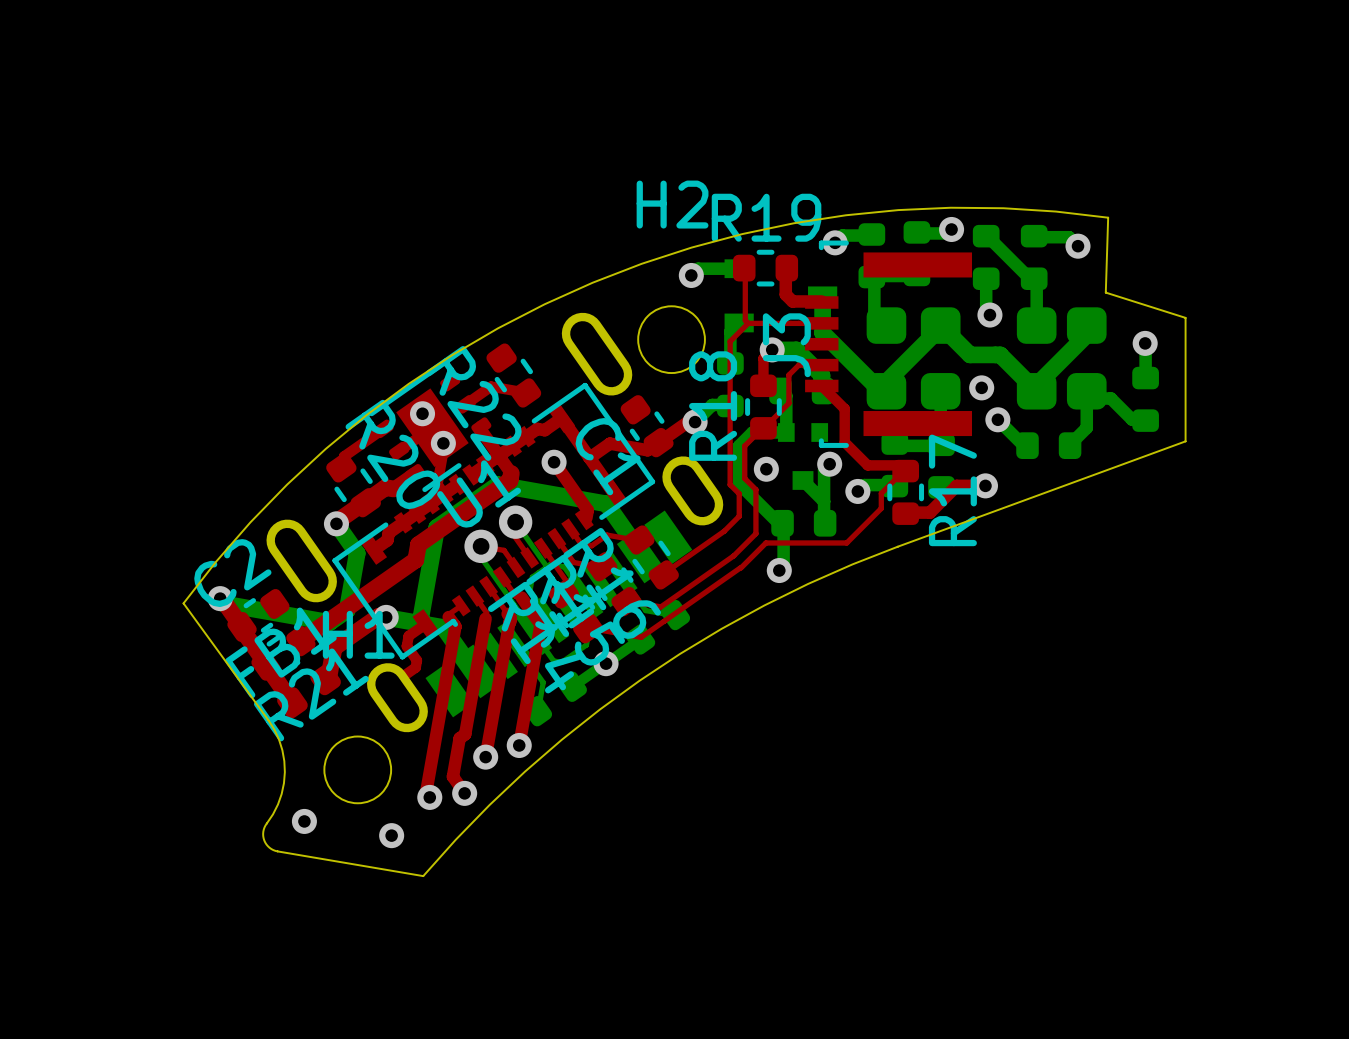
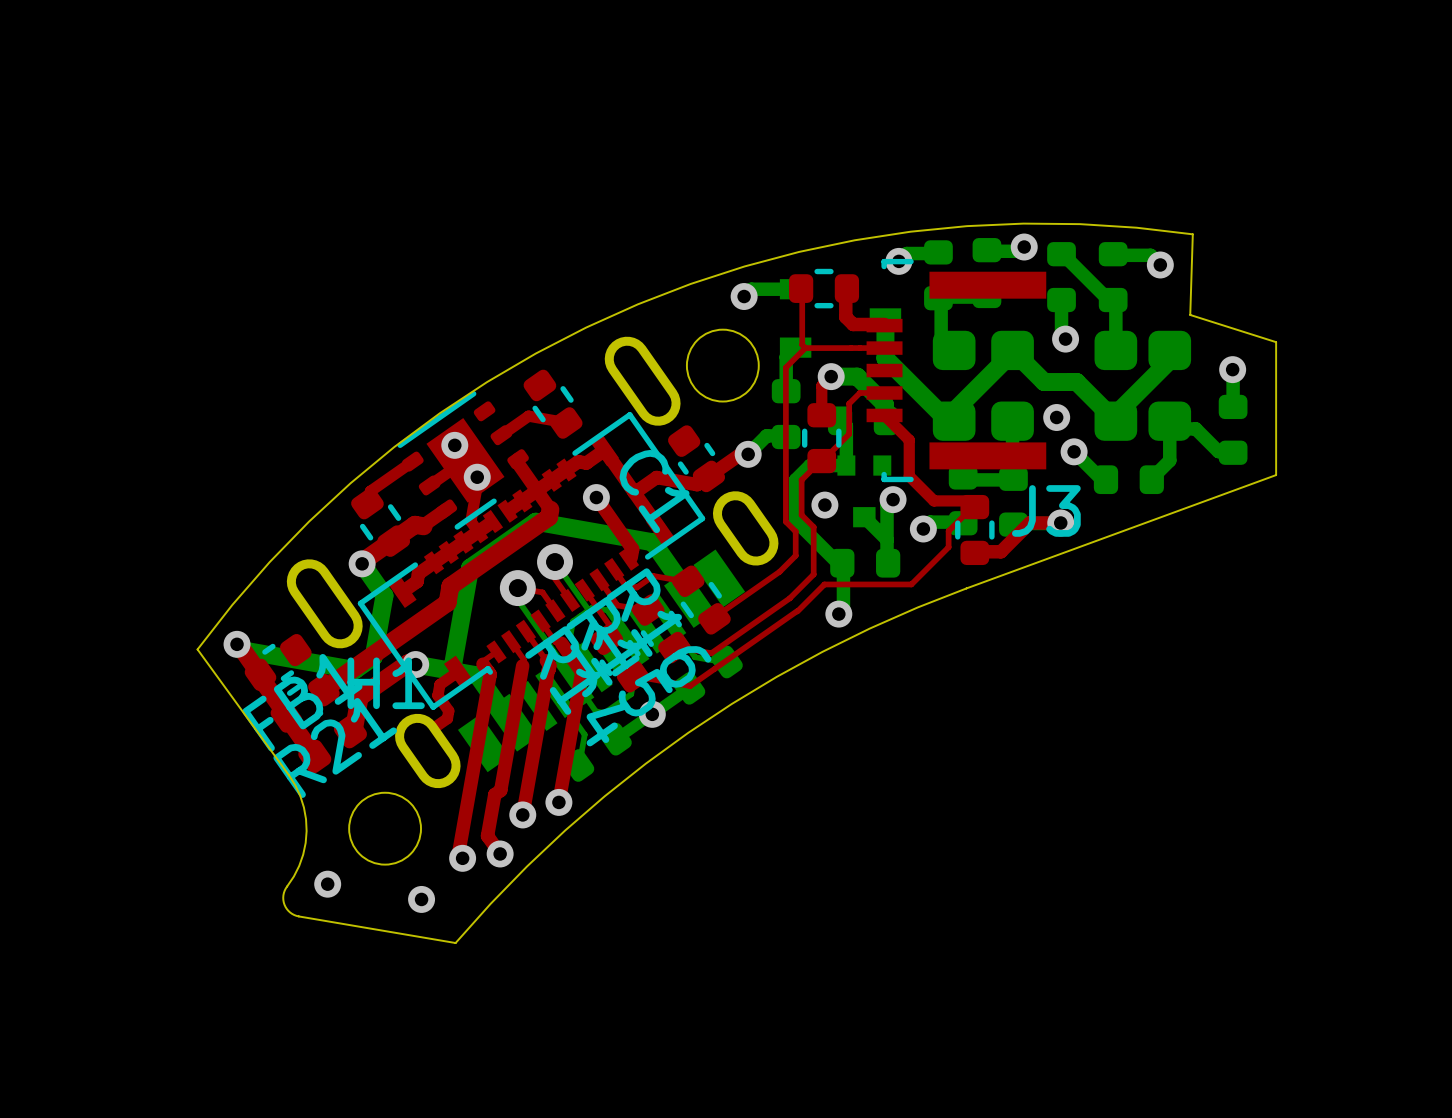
H2 name: H2 (672, 204) -> none
R19 name: R19 (766, 217) -> none
J3 name rotation: 0° (786, 345) -> 90° clockwise (1046, 510)
J3 name position: J3 (786, 345) -> J3 (1046, 510)
R22 name: R22 (473, 403) -> none
R18 name: R18 (713, 406) -> none
R20 name: R20 (392, 454) -> none
R17 name: R17 (952, 490) -> none
U1 name: U1 (479, 493) -> none
C2 name: C2 (232, 573) -> none

